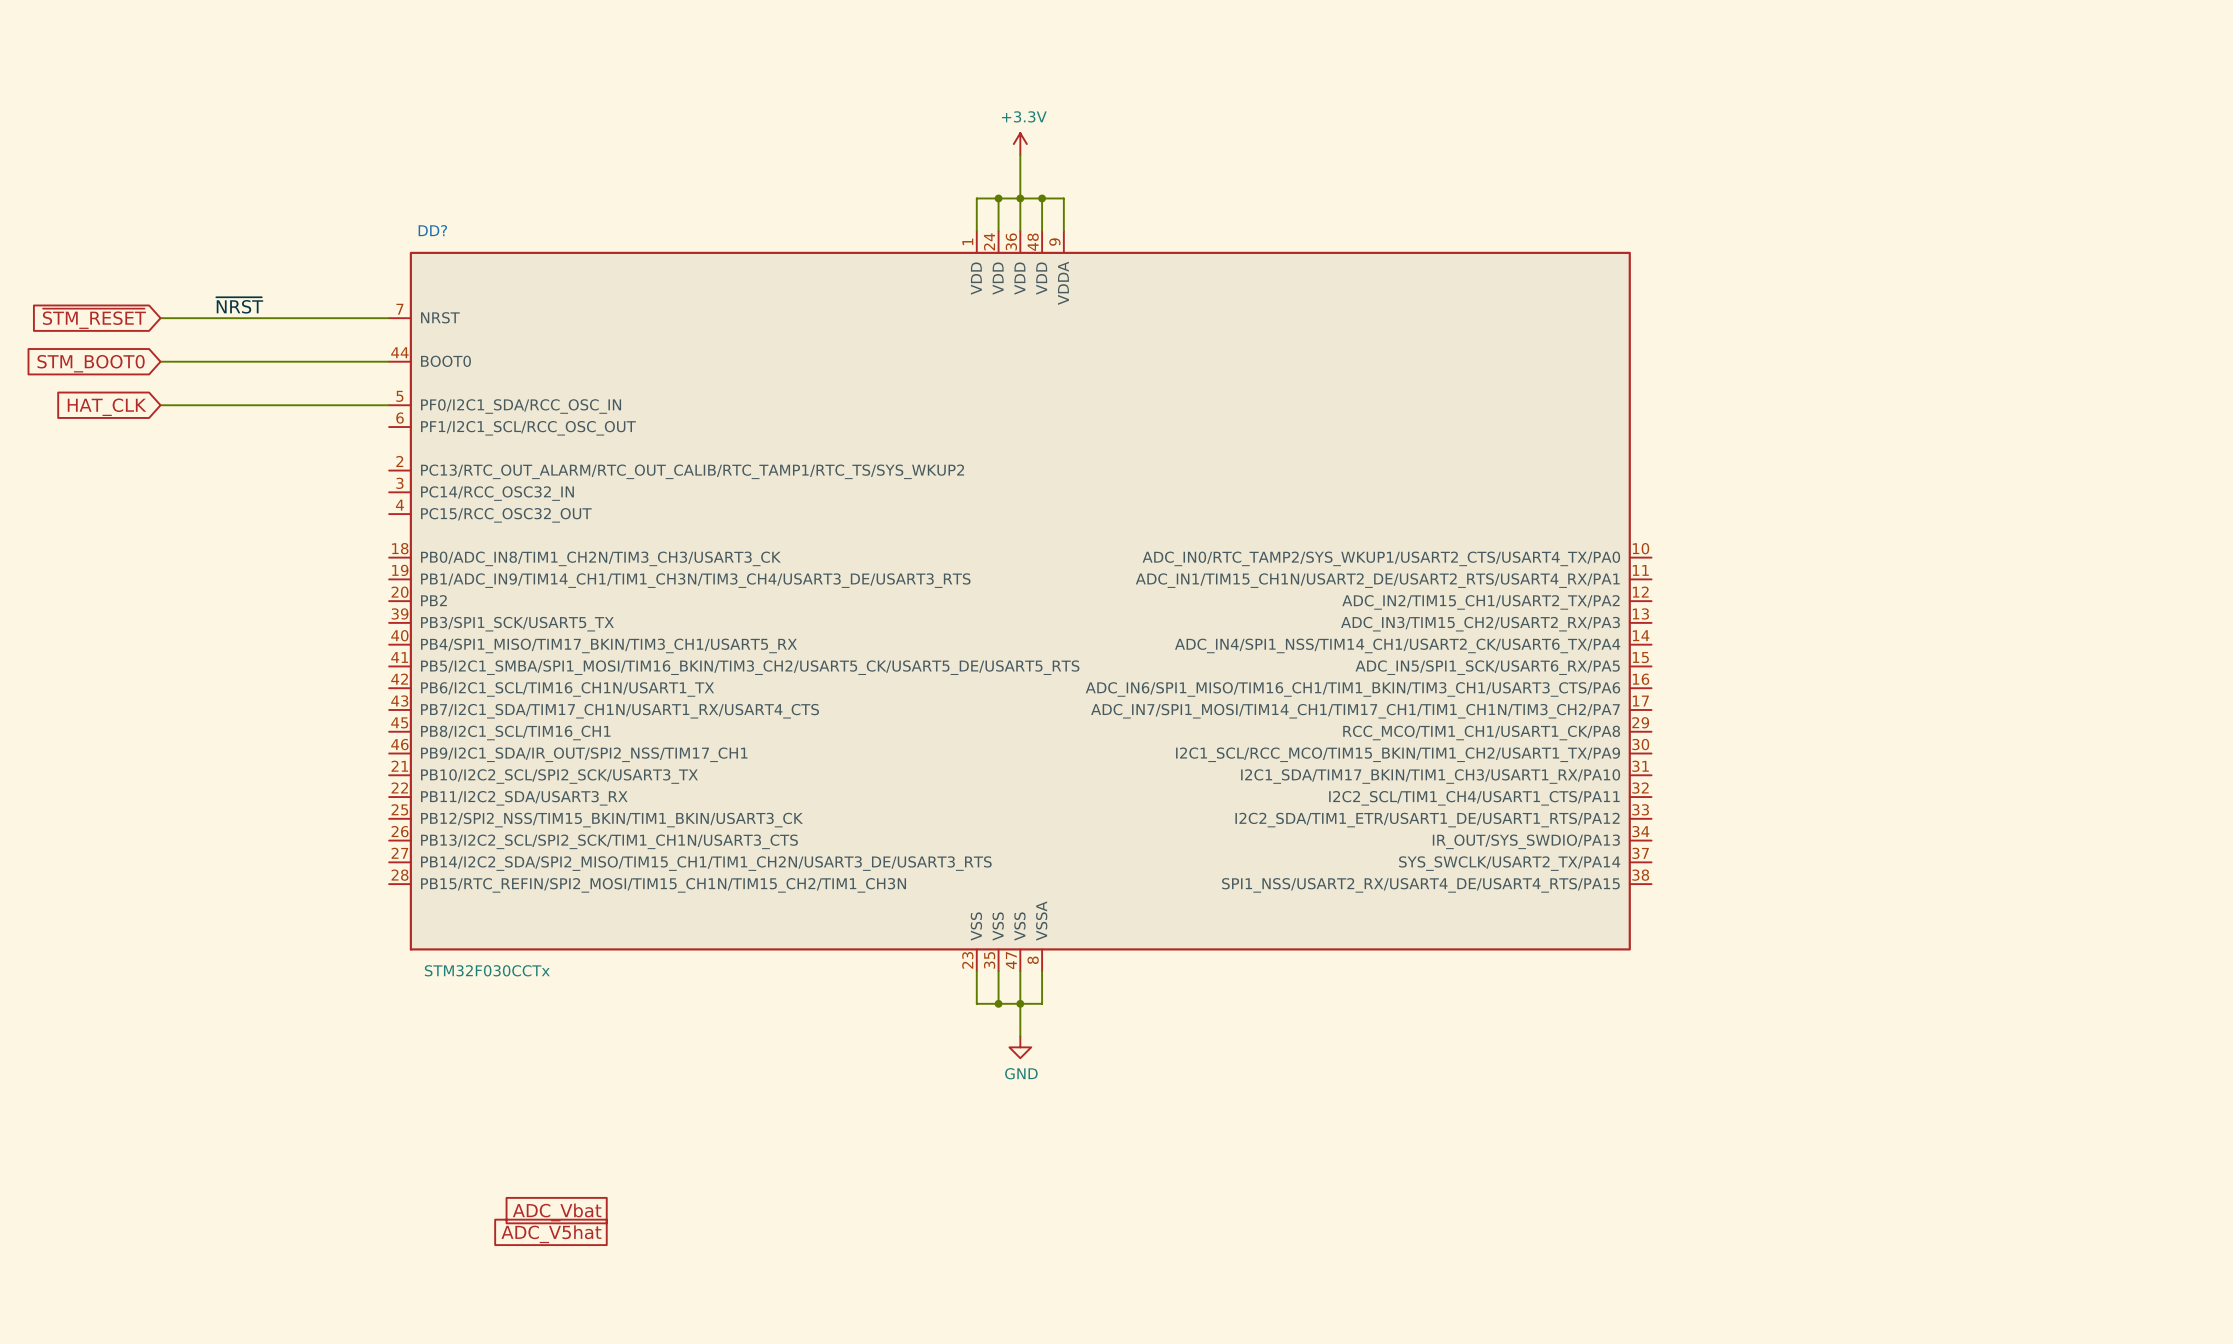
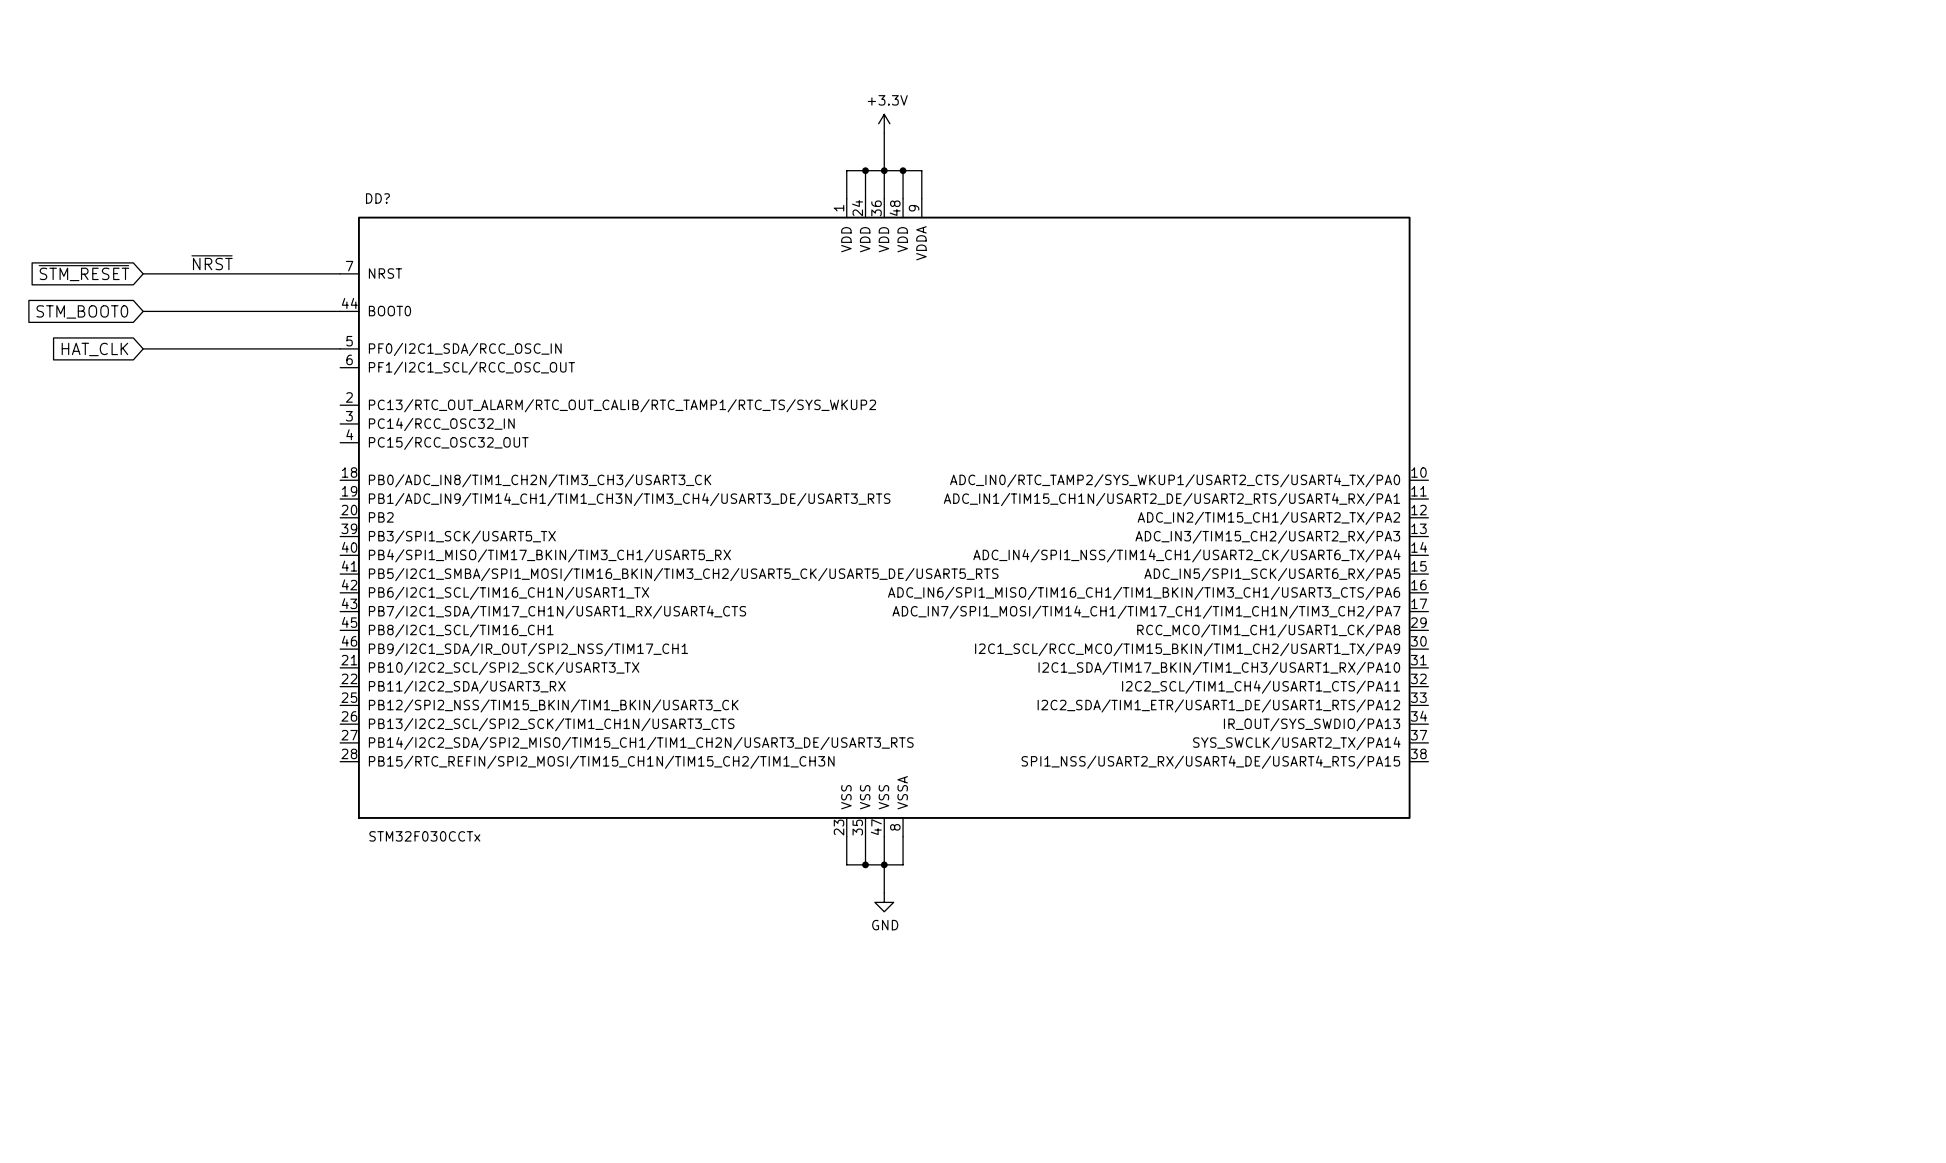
global label: ADC_Vbat (557, 1212) -> none
global label: ADC_V5hat (551, 1234) -> none

